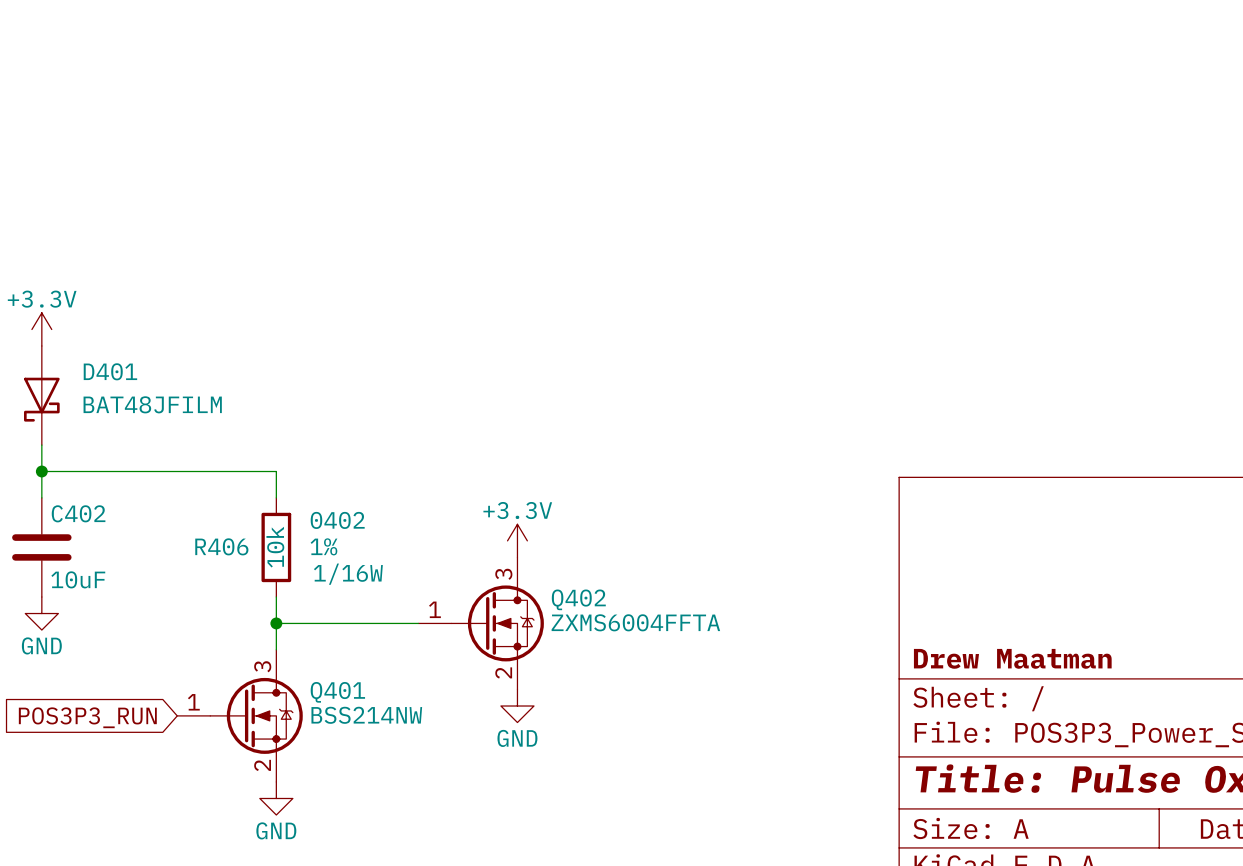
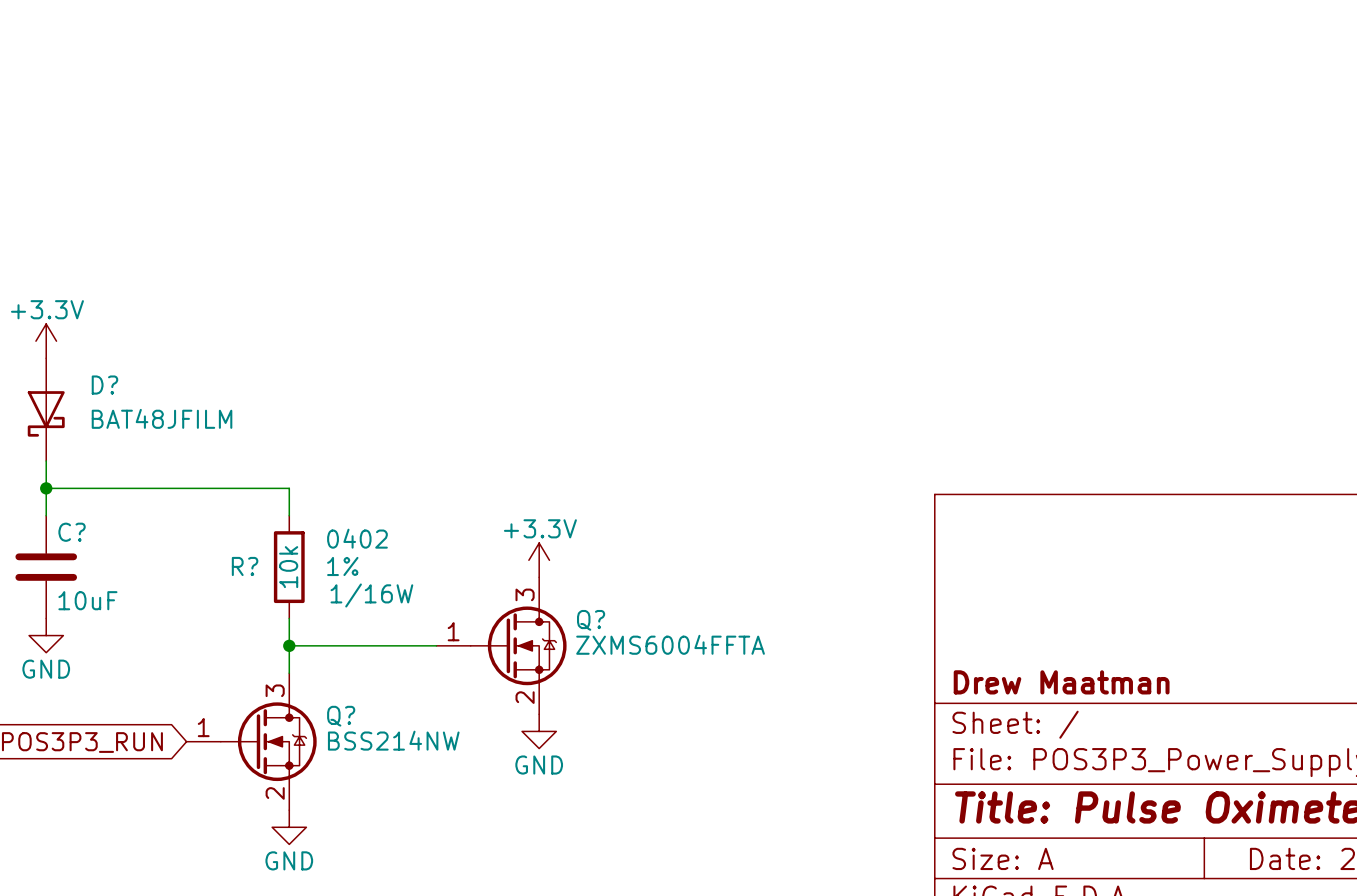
D401 name: D401 (110, 371) -> D? (104, 385)
C402 name: C402 (78, 513) -> C? (72, 532)
R406 name: R406 (221, 546) -> R? (245, 566)
Q402 name: Q402 (578, 599) -> Q? (591, 620)
Q401 name: Q401 (337, 692) -> Q? (341, 716)

